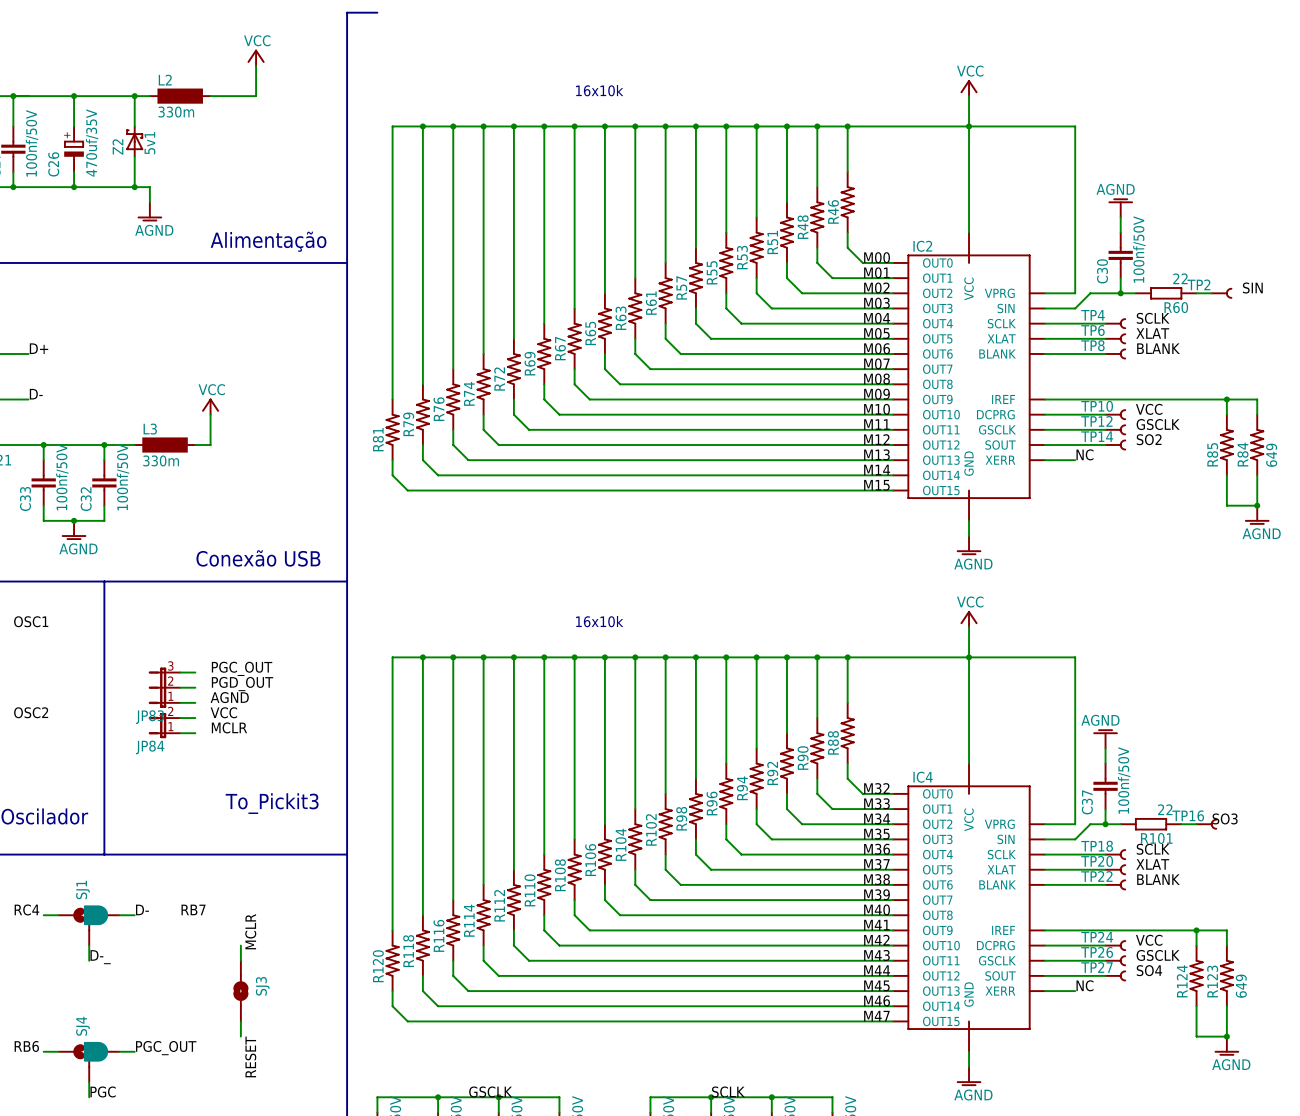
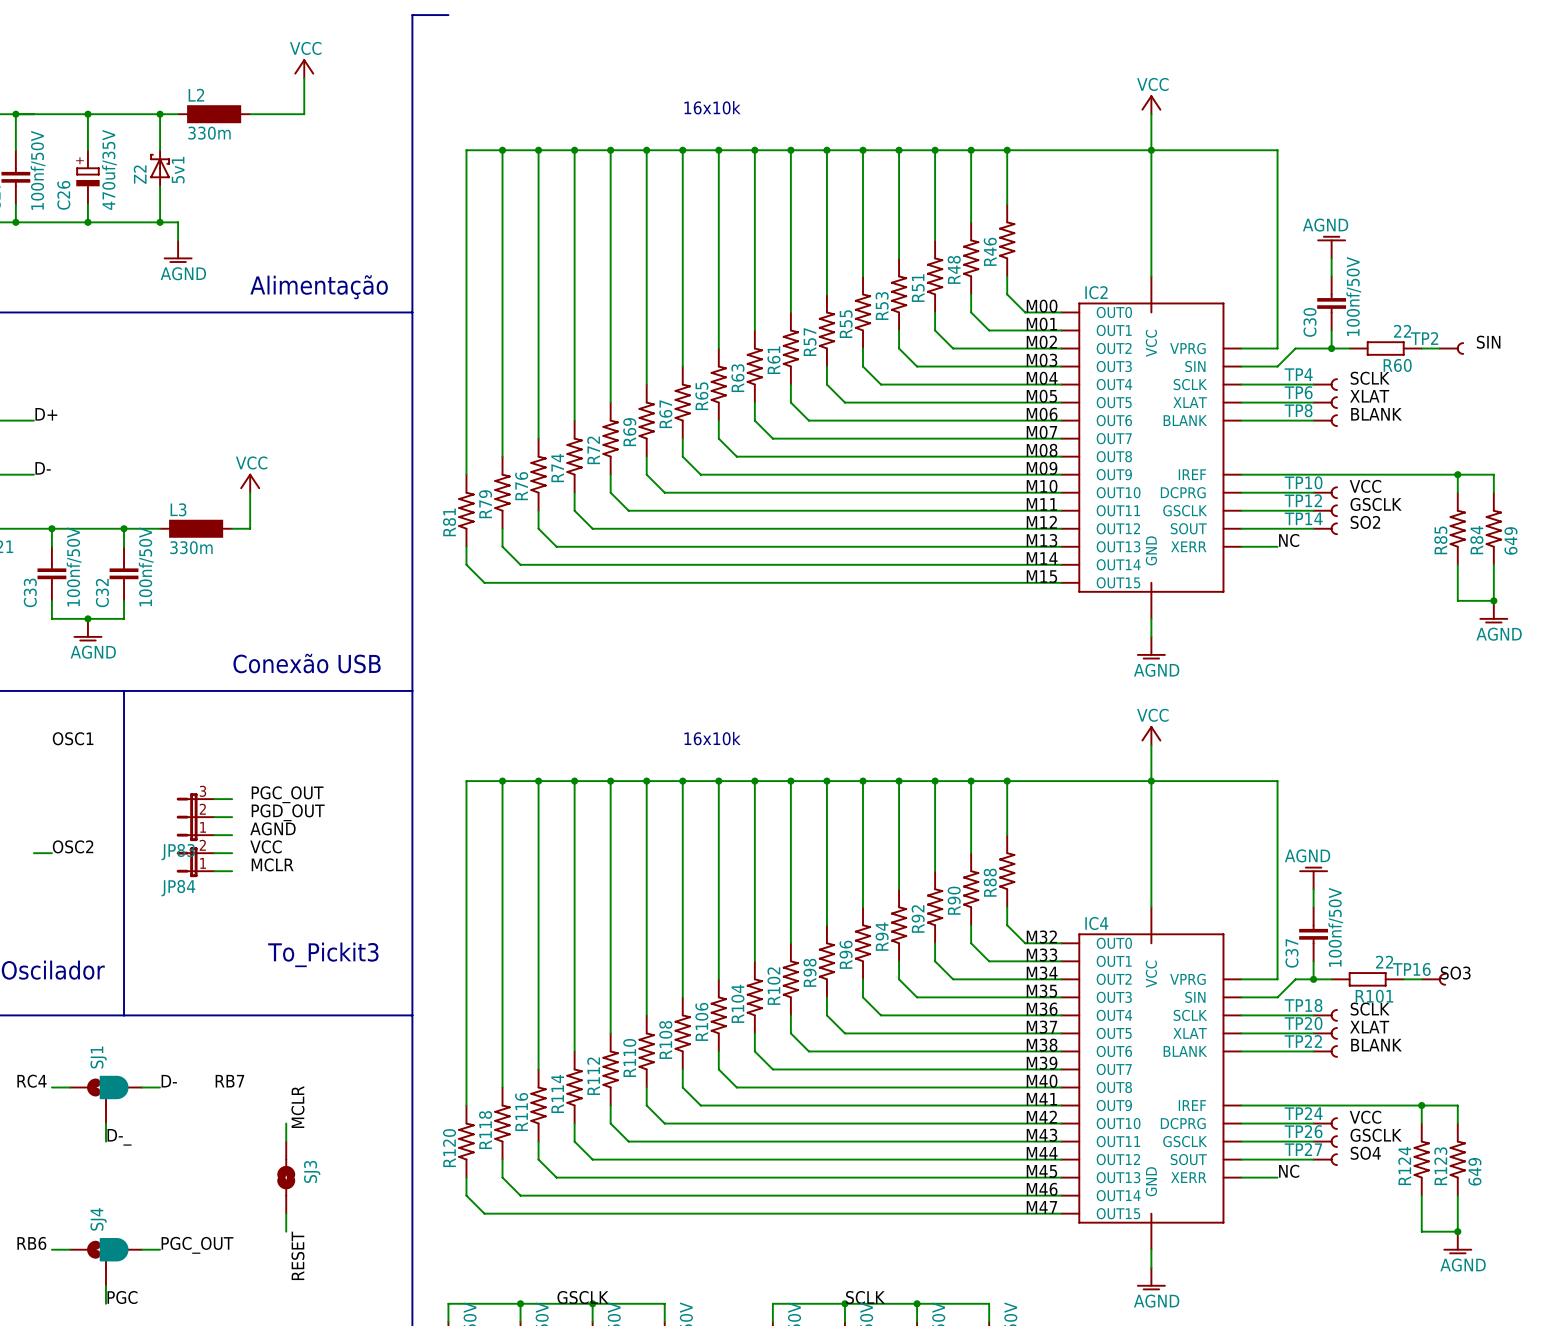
label position: OSC1 (31, 621) -> OSC1 (73, 738)
label position: OSC2 (31, 712) -> OSC2 (73, 846)
wire: none -> (33, 853) (51, 853)

